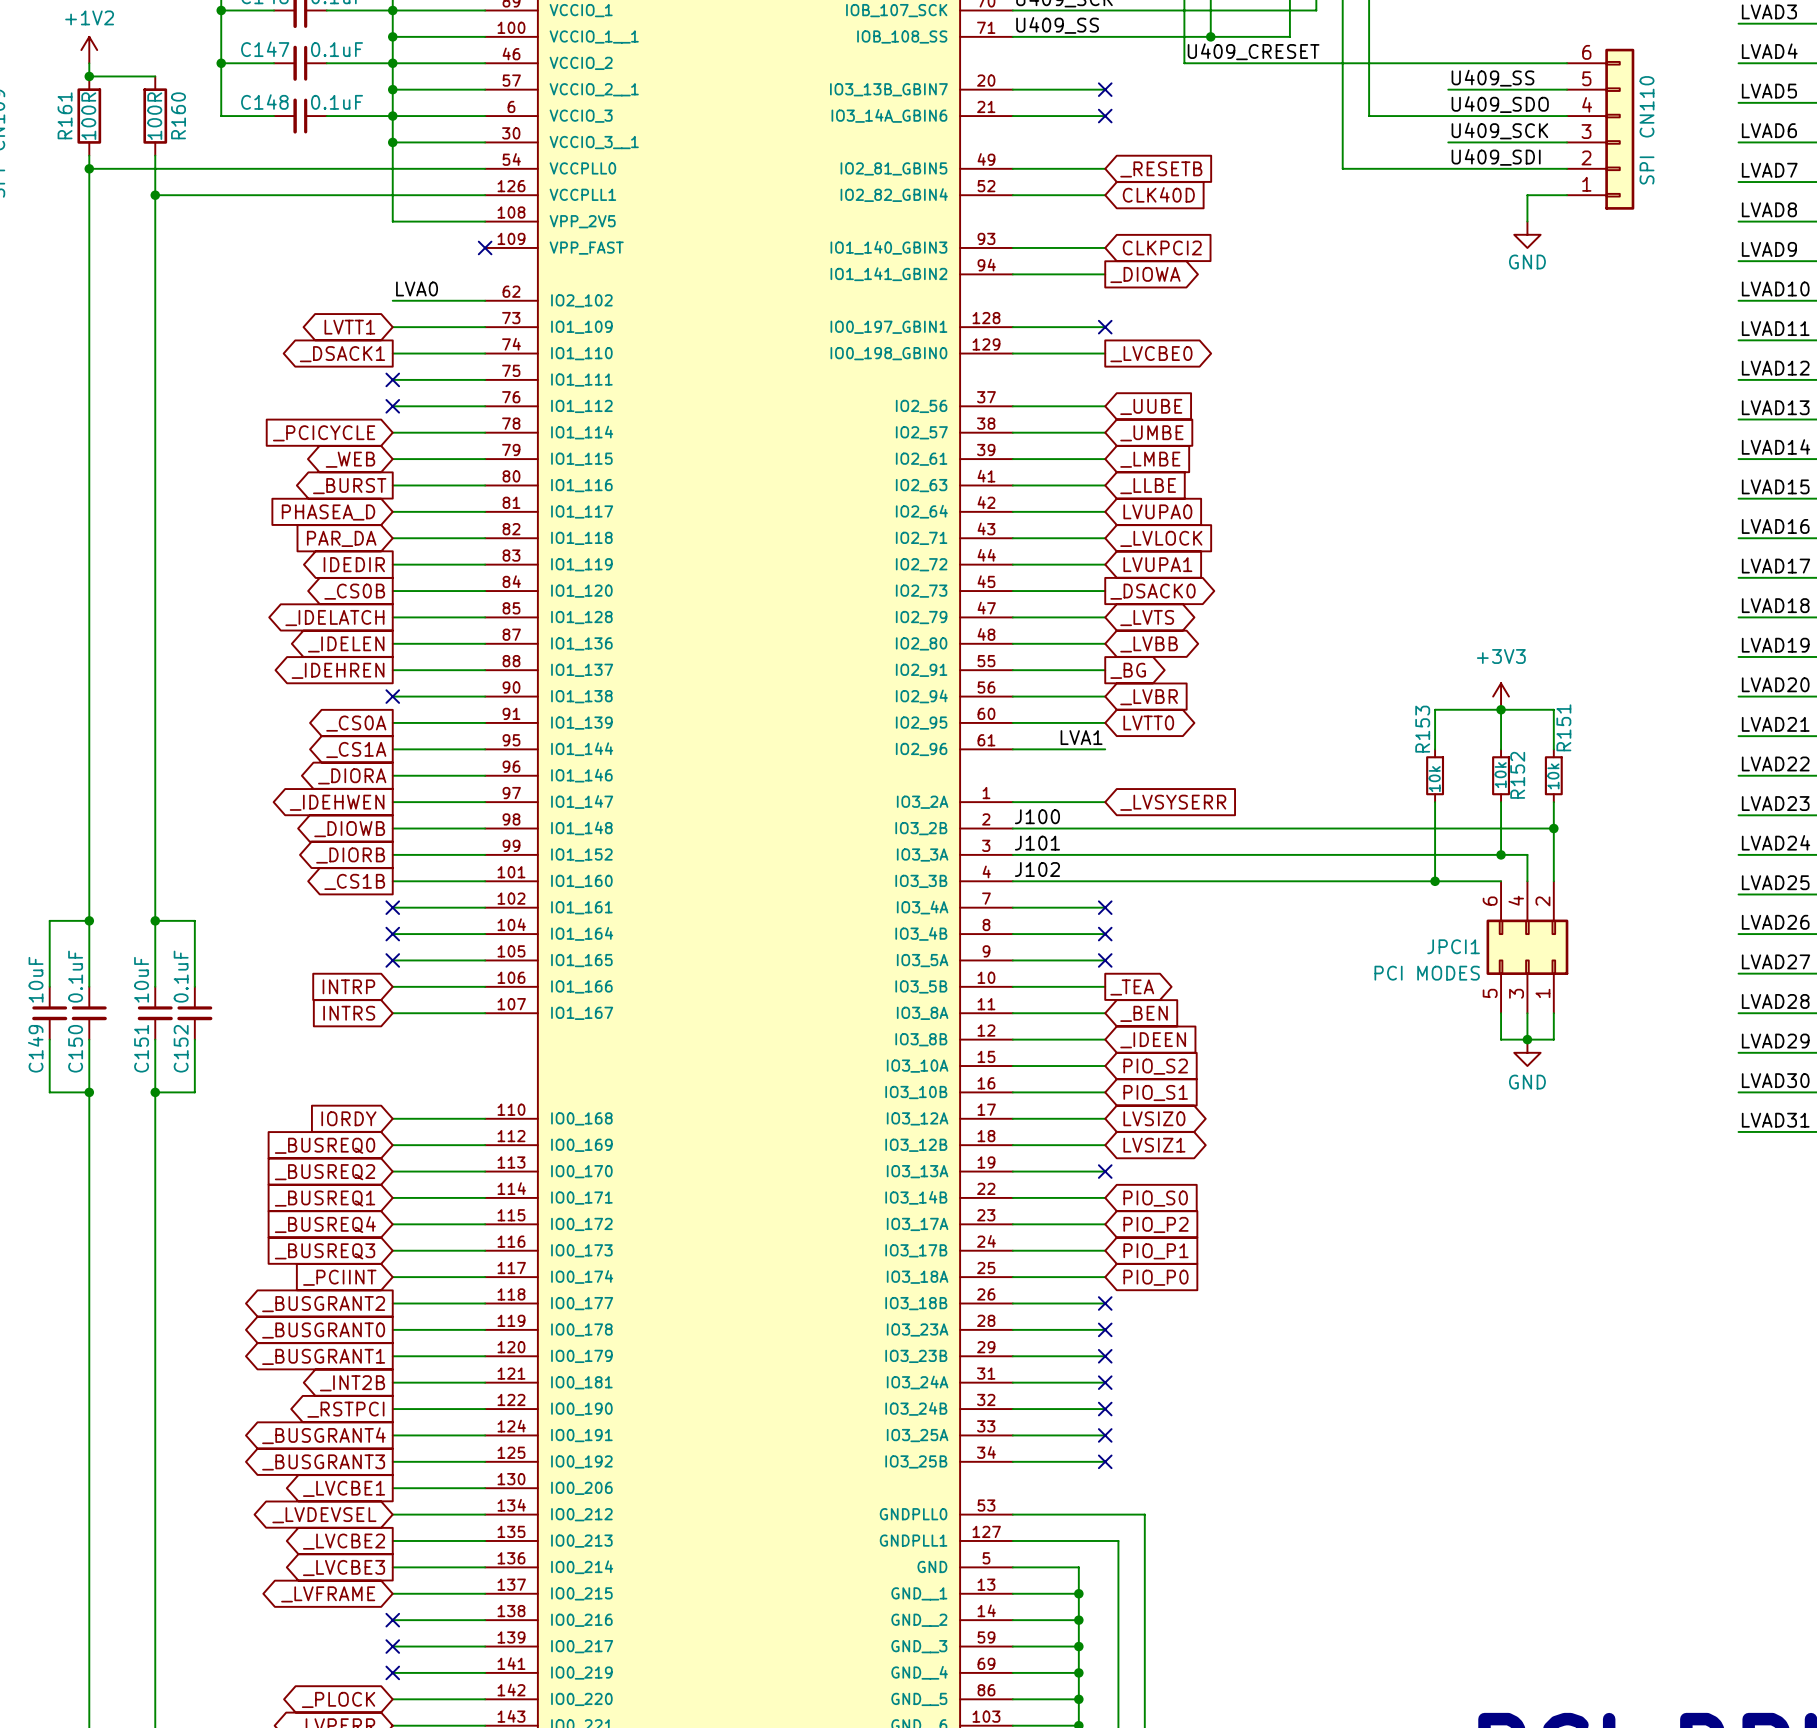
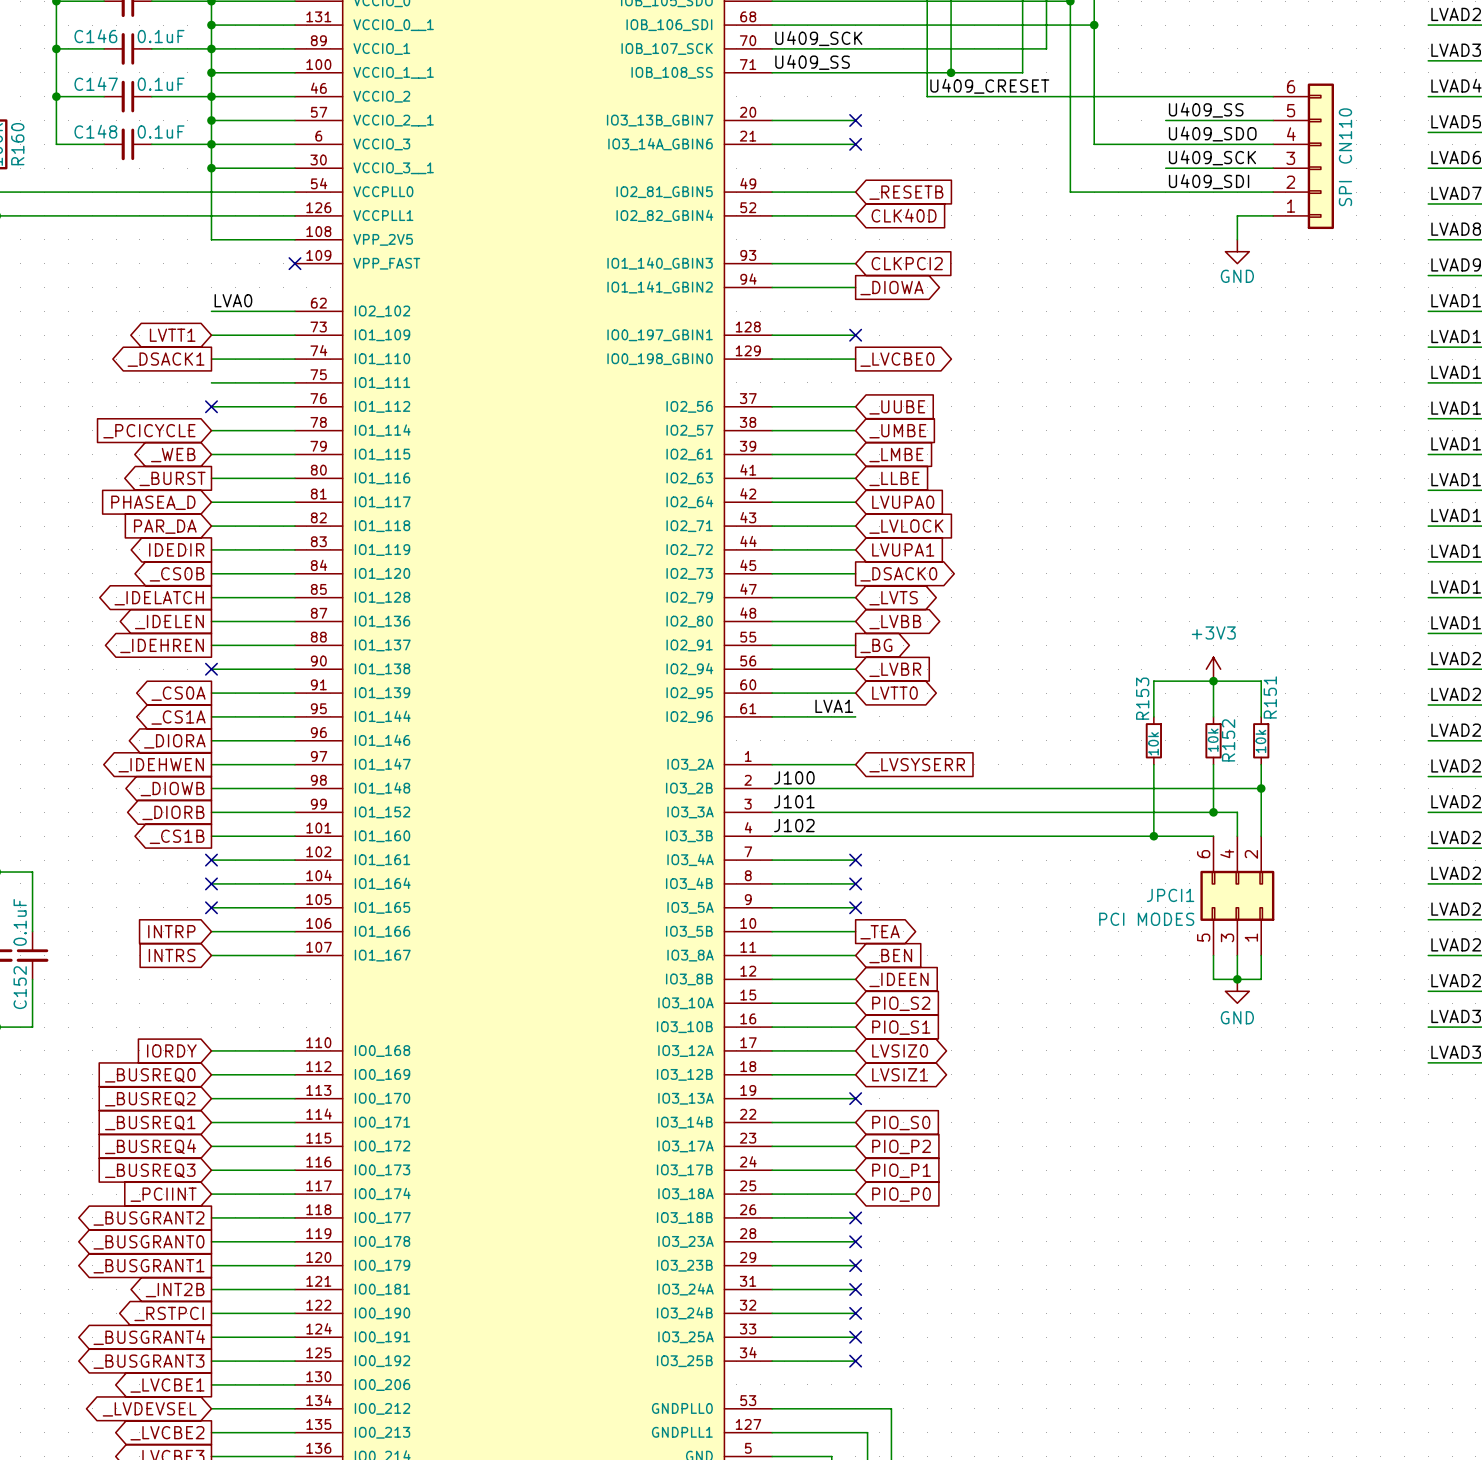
no-connect mark: (392, 379) -> none

